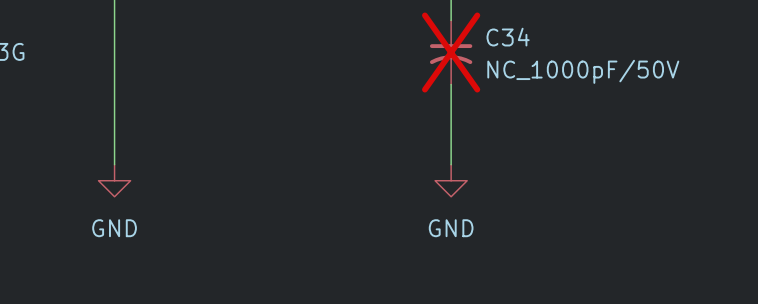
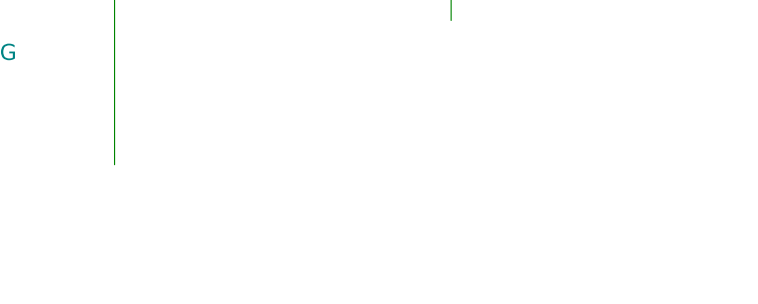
C34: NC_1000pF/50V (451, 52) -> none
wire: (451, 84) (451, 164) -> none
power symbol: GND (114, 180) -> none
power symbol: GND (451, 180) -> none

